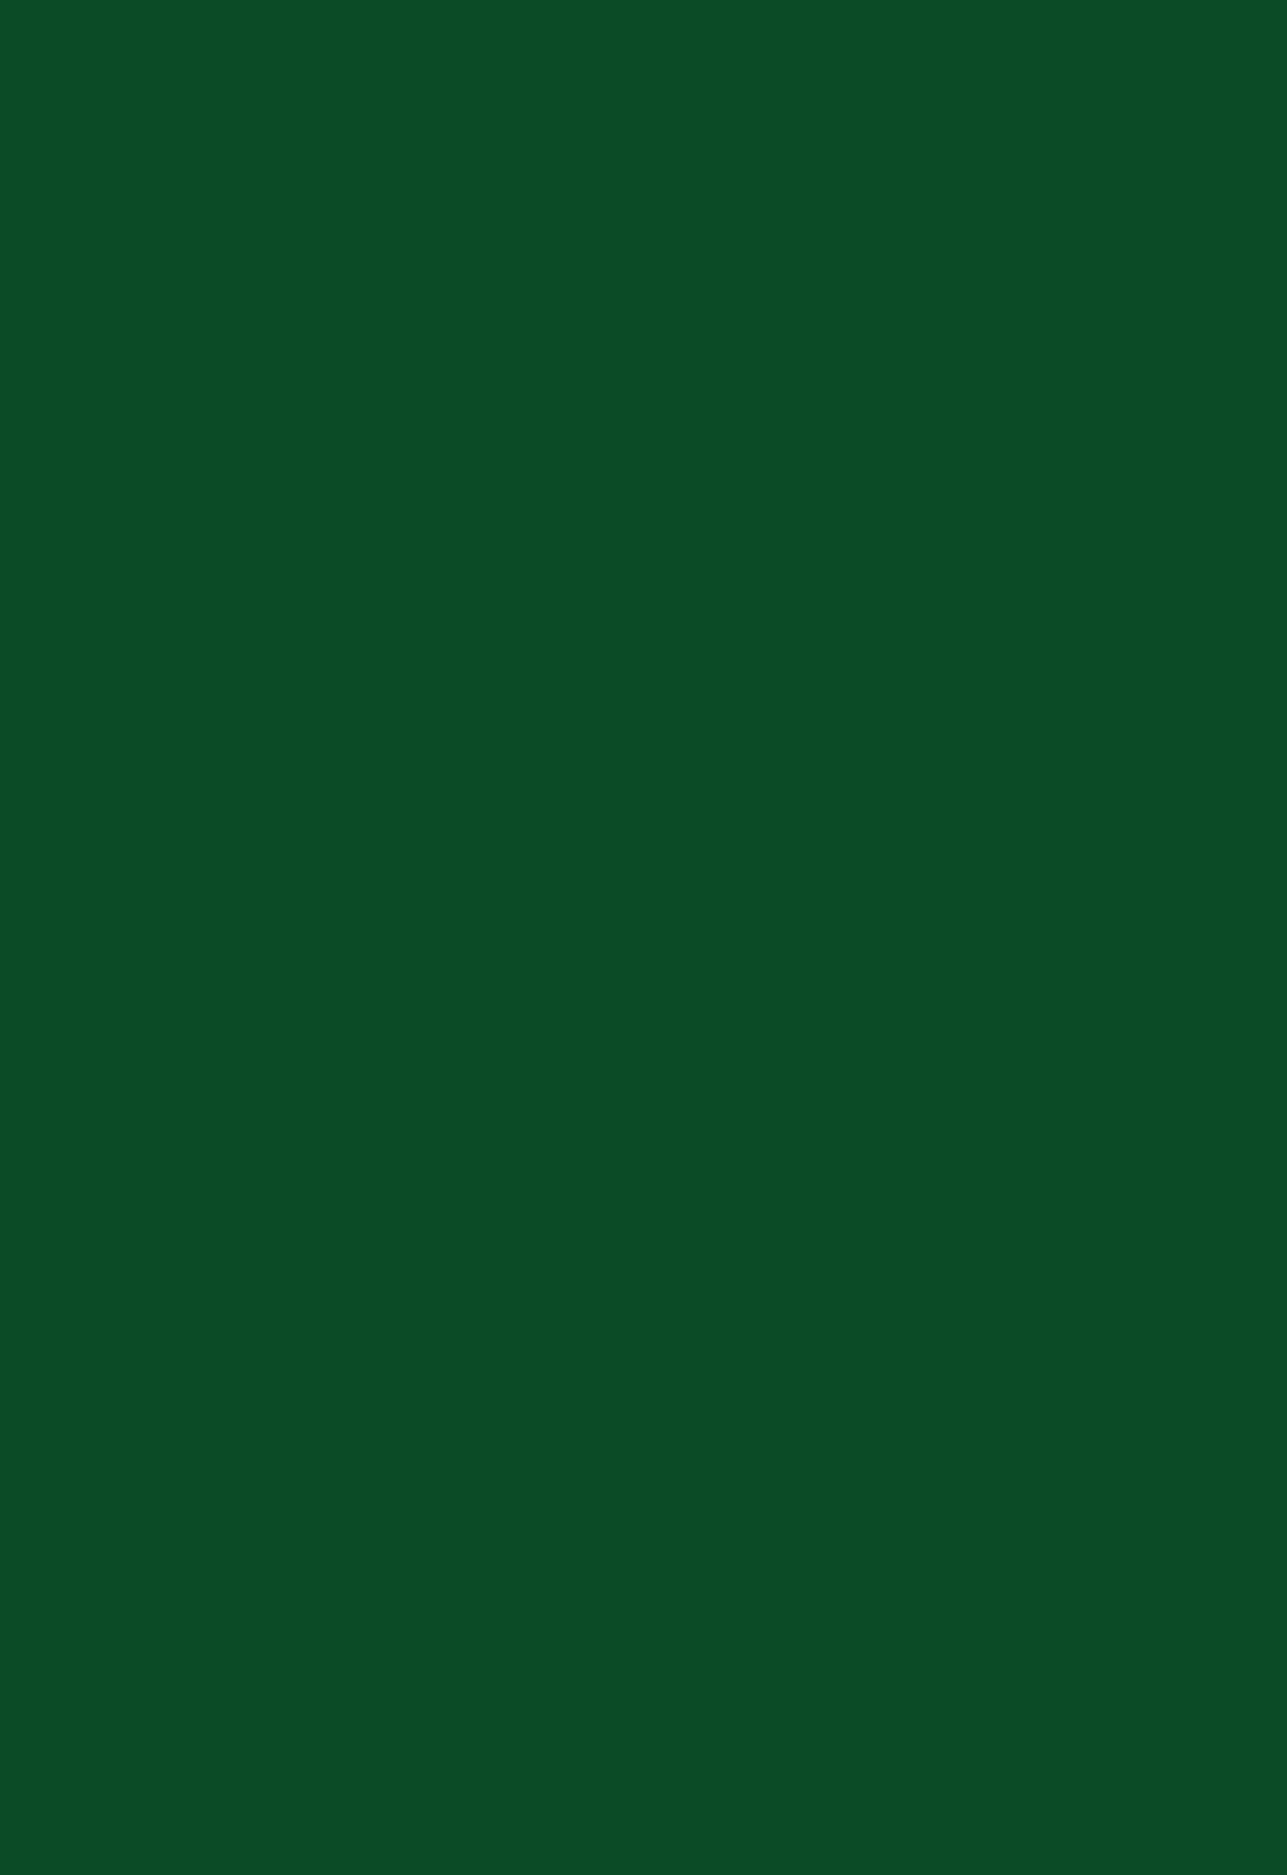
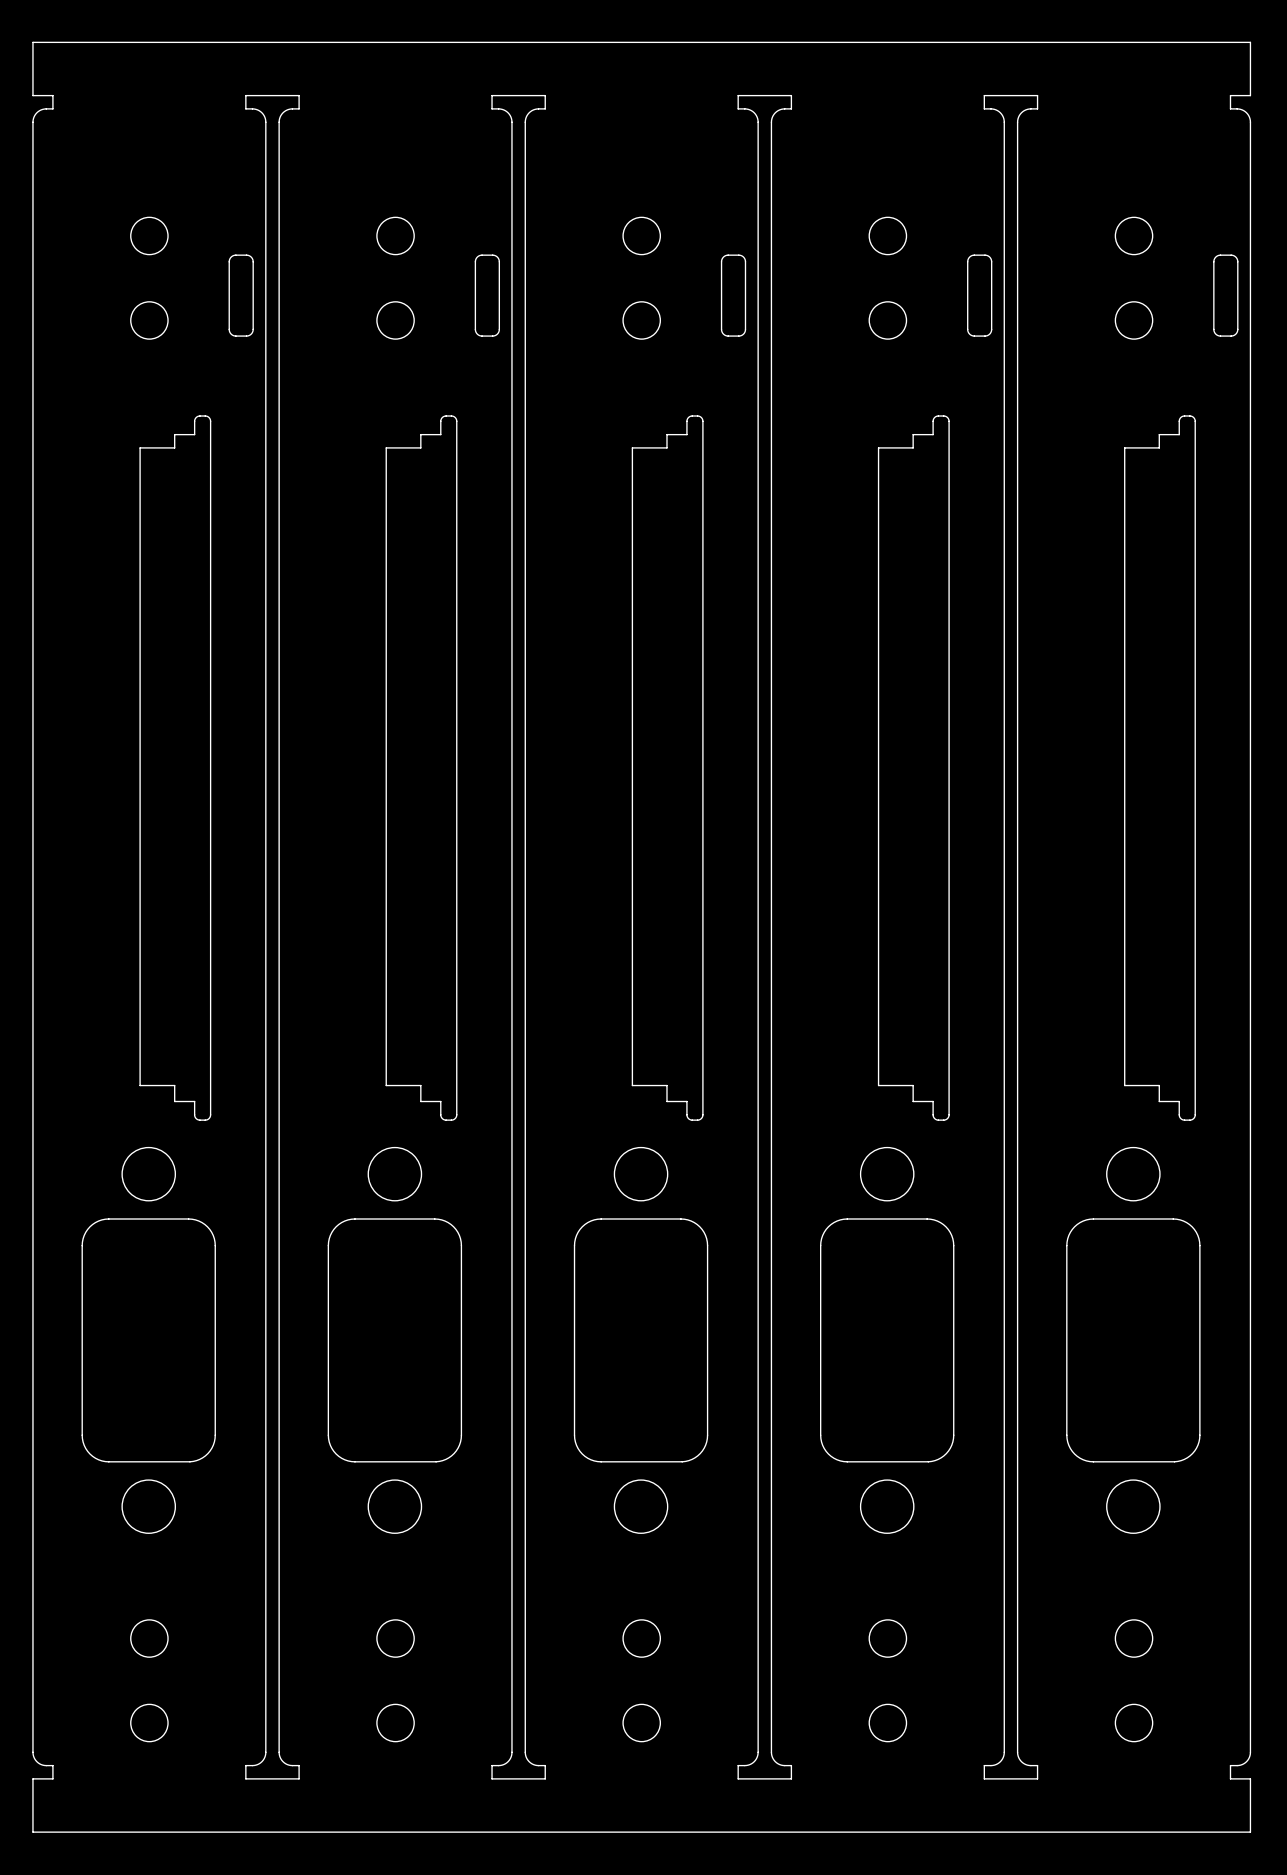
board edge: none -> (1250, 42) (1250, 95) (1230, 95) (1230, 108) (1243, 110) (1248, 115) (1250, 122) (1250, 1752) (1248, 1758) (1243, 1763) (1230, 1765) (1230, 1778) (1250, 1778) (1250, 1832) (32, 1832) (32, 1778) (52, 1778) (52, 1765) (39, 1763) (34, 1758) (32, 1752) (32, 122) (34, 115) (39, 110) (52, 108) (52, 95) (32, 95) (32, 42) (1250, 42)
board edge: none -> (299, 95) (299, 108) (285, 110) (280, 115) (279, 122) (279, 1752) (280, 1758) (285, 1763) (299, 1765) (299, 1778) (245, 1778) (245, 1765) (259, 1763) (264, 1758) (265, 1752) (265, 122) (264, 115) (259, 110) (245, 108) (245, 95) (299, 95)
board edge: none -> (545, 95) (545, 108) (531, 110) (527, 115) (525, 122) (525, 1752) (527, 1758) (531, 1763) (545, 1765) (545, 1778) (492, 1778) (492, 1765) (505, 1763) (510, 1758) (511, 1752) (511, 122) (510, 115) (505, 110) (492, 108) (492, 95) (545, 95)
board edge: none -> (791, 95) (791, 108) (778, 110) (773, 115) (771, 122) (771, 1752) (773, 1758) (778, 1763) (791, 1765) (791, 1778) (738, 1778) (738, 1765) (751, 1763) (756, 1758) (758, 1752) (758, 122) (756, 115) (751, 110) (738, 108) (738, 95) (791, 95)
board edge: none -> (1037, 95) (1037, 108) (1024, 110) (1019, 115) (1017, 122) (1017, 1752) (1019, 1758) (1024, 1763) (1037, 1765) (1037, 1778) (984, 1778) (984, 1765) (997, 1763) (1002, 1758) (1004, 1752) (1004, 122) (1002, 115) (997, 110) (984, 108) (984, 95) (1037, 95)
round board edge: none -> [130, 216, 169, 256]
round board edge: none -> [376, 216, 415, 256]
round board edge: none -> [622, 216, 662, 256]
round board edge: none -> [868, 216, 908, 256]
round board edge: none -> [1114, 216, 1154, 256]
board edge: none -> (246, 255) (234, 255) (229, 260) (229, 330) (235, 336) (248, 335) (253, 330) (253, 260) (251, 257) (246, 255)
board edge: none -> (492, 255) (480, 255) (475, 260) (475, 330) (481, 336) (494, 335) (499, 330) (499, 260) (497, 257) (492, 255)
board edge: none -> (738, 255) (726, 255) (721, 260) (721, 330) (727, 336) (740, 335) (745, 330) (745, 260) (743, 257) (738, 255)
board edge: none -> (984, 255) (972, 255) (967, 260) (967, 330) (973, 336) (986, 335) (991, 330) (991, 260) (989, 257) (984, 255)
board edge: none -> (1231, 255) (1218, 255) (1213, 260) (1213, 330) (1219, 336) (1232, 335) (1237, 330) (1237, 260) (1235, 257) (1231, 255)
round board edge: none -> [130, 301, 169, 340]
round board edge: none -> [376, 301, 415, 340]
round board edge: none -> [622, 301, 662, 340]
round board edge: none -> [868, 301, 908, 340]
round board edge: none -> [1114, 301, 1154, 340]
board edge: none -> (205, 416) (198, 416) (195, 418) (194, 434) (174, 434) (174, 447) (140, 447) (140, 1085) (174, 1085) (174, 1101) (194, 1101) (194, 1116) (199, 1120) (207, 1119) (210, 1114) (210, 421) (209, 417) (205, 416)
board edge: none -> (451, 416) (444, 416) (441, 418) (440, 434) (420, 434) (420, 447) (386, 447) (386, 1085) (420, 1085) (420, 1101) (440, 1101) (440, 1116) (446, 1120) (454, 1119) (456, 1114) (456, 421) (455, 417) (451, 416)
board edge: none -> (697, 416) (690, 416) (687, 418) (686, 434) (666, 434) (666, 447) (632, 447) (632, 1085) (666, 1085) (666, 1101) (686, 1101) (687, 1116) (692, 1120) (700, 1119) (702, 1114) (702, 421) (701, 417) (697, 416)
board edge: none -> (943, 416) (937, 416) (933, 418) (933, 434) (913, 434) (913, 447) (878, 447) (878, 1085) (913, 1085) (913, 1101) (933, 1101) (933, 1116) (938, 1120) (946, 1119) (949, 1114) (949, 421) (947, 417) (943, 416)
board edge: none -> (1189, 416) (1183, 416) (1179, 418) (1179, 434) (1159, 434) (1159, 447) (1124, 447) (1124, 1085) (1159, 1085) (1159, 1101) (1179, 1101) (1179, 1116) (1184, 1120) (1192, 1119) (1195, 1114) (1195, 421) (1193, 417) (1189, 416)
round board edge: none -> [121, 1146, 177, 1202]
round board edge: none -> [367, 1146, 423, 1202]
round board edge: none -> [613, 1146, 669, 1202]
round board edge: none -> [859, 1146, 915, 1202]
round board edge: none -> [1106, 1146, 1161, 1202]
board edge: none -> (188, 1219) (105, 1219) (92, 1224) (84, 1235) (82, 1245) (82, 1435) (87, 1451) (98, 1459) (108, 1461) (193, 1461) (205, 1455) (213, 1445) (215, 1435) (215, 1242) (207, 1226) (198, 1221) (188, 1219)
board edge: none -> (434, 1219) (351, 1219) (338, 1224) (330, 1235) (328, 1245) (328, 1435) (333, 1451) (344, 1459) (354, 1461) (439, 1461) (451, 1455) (459, 1445) (461, 1435) (461, 1242) (453, 1226) (444, 1221) (434, 1219)
board edge: none -> (680, 1219) (597, 1219) (584, 1224) (576, 1235) (574, 1245) (574, 1435) (580, 1451) (590, 1459) (601, 1461) (685, 1461) (697, 1455) (705, 1445) (707, 1435) (707, 1242) (699, 1226) (691, 1221) (680, 1219)
board edge: none -> (927, 1219) (843, 1219) (831, 1224) (822, 1235) (820, 1245) (820, 1435) (826, 1451) (837, 1459) (847, 1461) (931, 1461) (943, 1455) (951, 1445) (953, 1435) (953, 1242) (945, 1226) (937, 1221) (927, 1219)
board edge: none -> (1173, 1219) (1089, 1219) (1077, 1224) (1068, 1235) (1066, 1245) (1066, 1435) (1072, 1451) (1083, 1459) (1093, 1461) (1177, 1461) (1190, 1455) (1197, 1445) (1199, 1435) (1199, 1242) (1192, 1226) (1183, 1221) (1173, 1219)
round board edge: none -> [121, 1479, 177, 1534]
round board edge: none -> [367, 1479, 423, 1534]
round board edge: none -> [613, 1479, 669, 1534]
round board edge: none -> [859, 1479, 915, 1534]
round board edge: none -> [1106, 1479, 1161, 1534]
round board edge: none -> [130, 1619, 169, 1658]
round board edge: none -> [376, 1619, 415, 1658]
round board edge: none -> [622, 1619, 662, 1658]
round board edge: none -> [868, 1619, 908, 1658]
round board edge: none -> [1114, 1619, 1154, 1658]
round board edge: none -> [130, 1703, 169, 1743]
round board edge: none -> [376, 1703, 415, 1743]
round board edge: none -> [622, 1703, 662, 1743]
round board edge: none -> [868, 1703, 908, 1743]
round board edge: none -> [1114, 1703, 1154, 1743]

